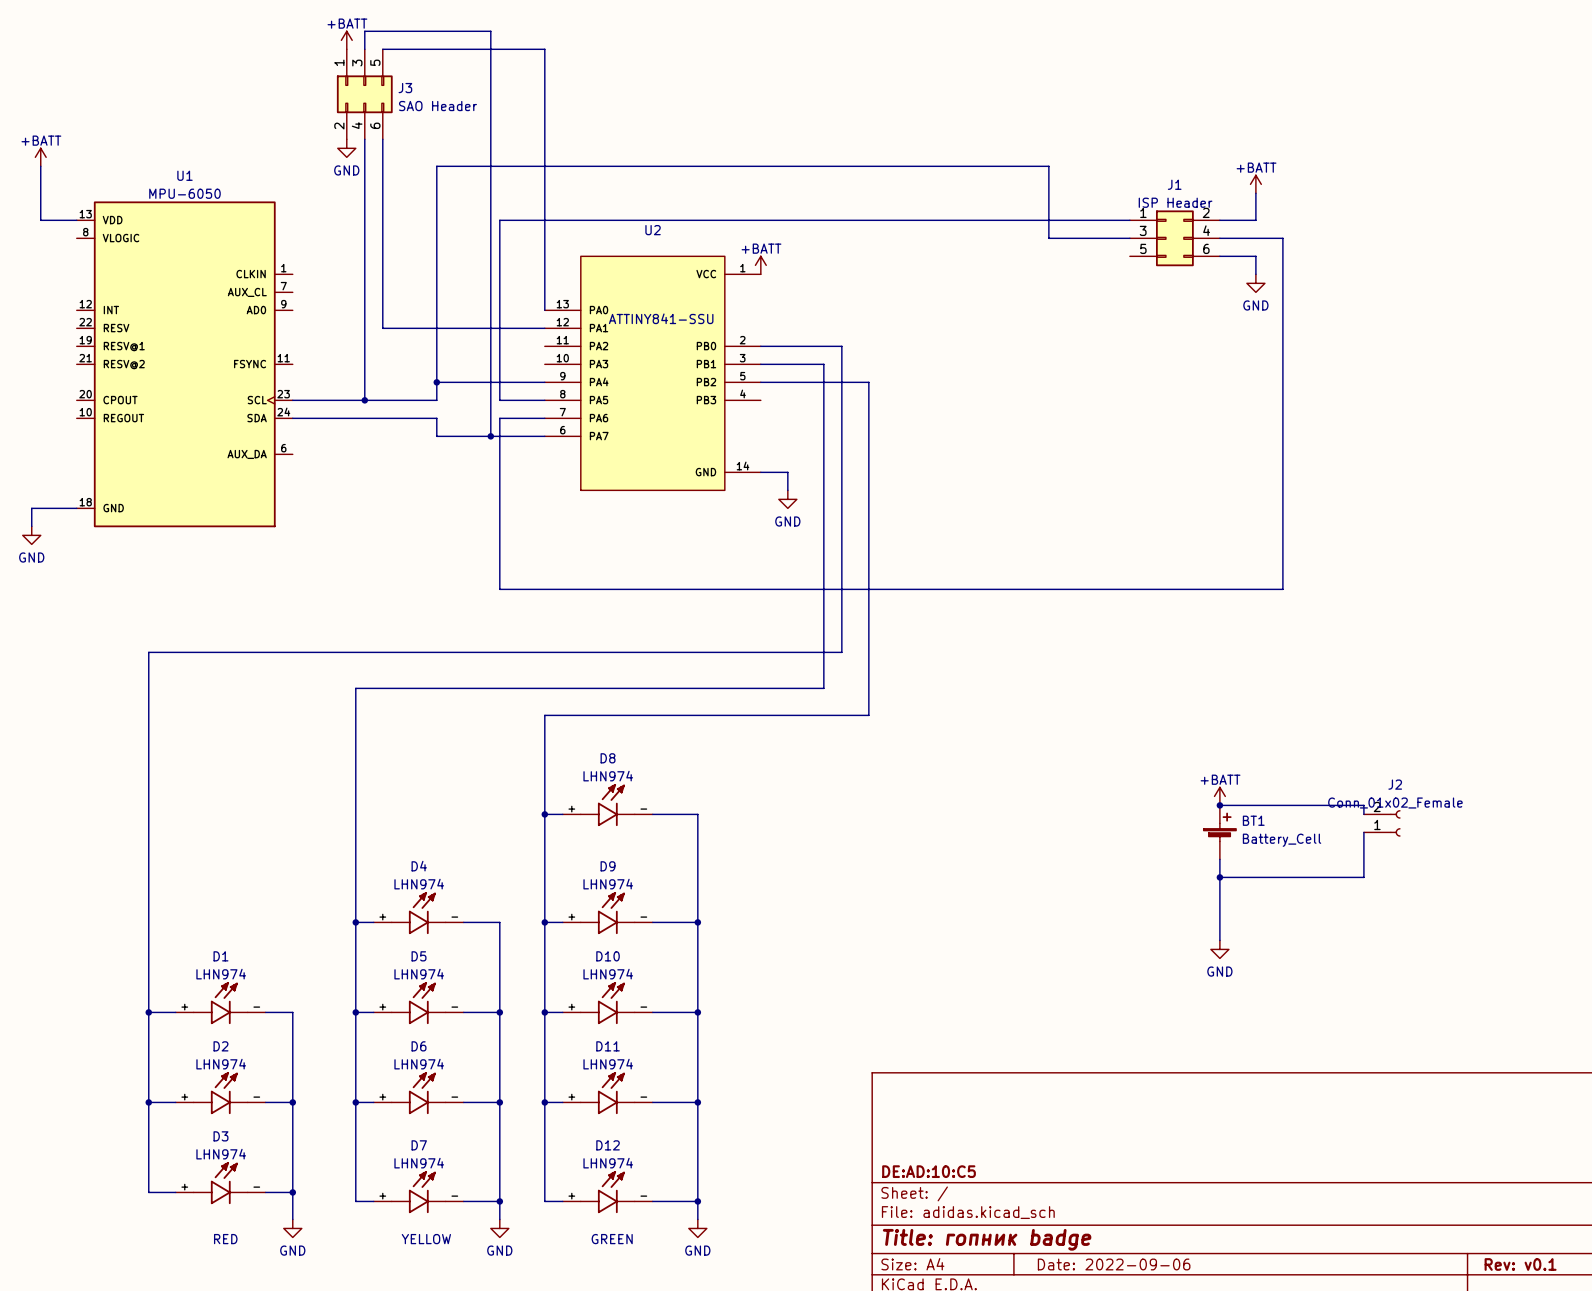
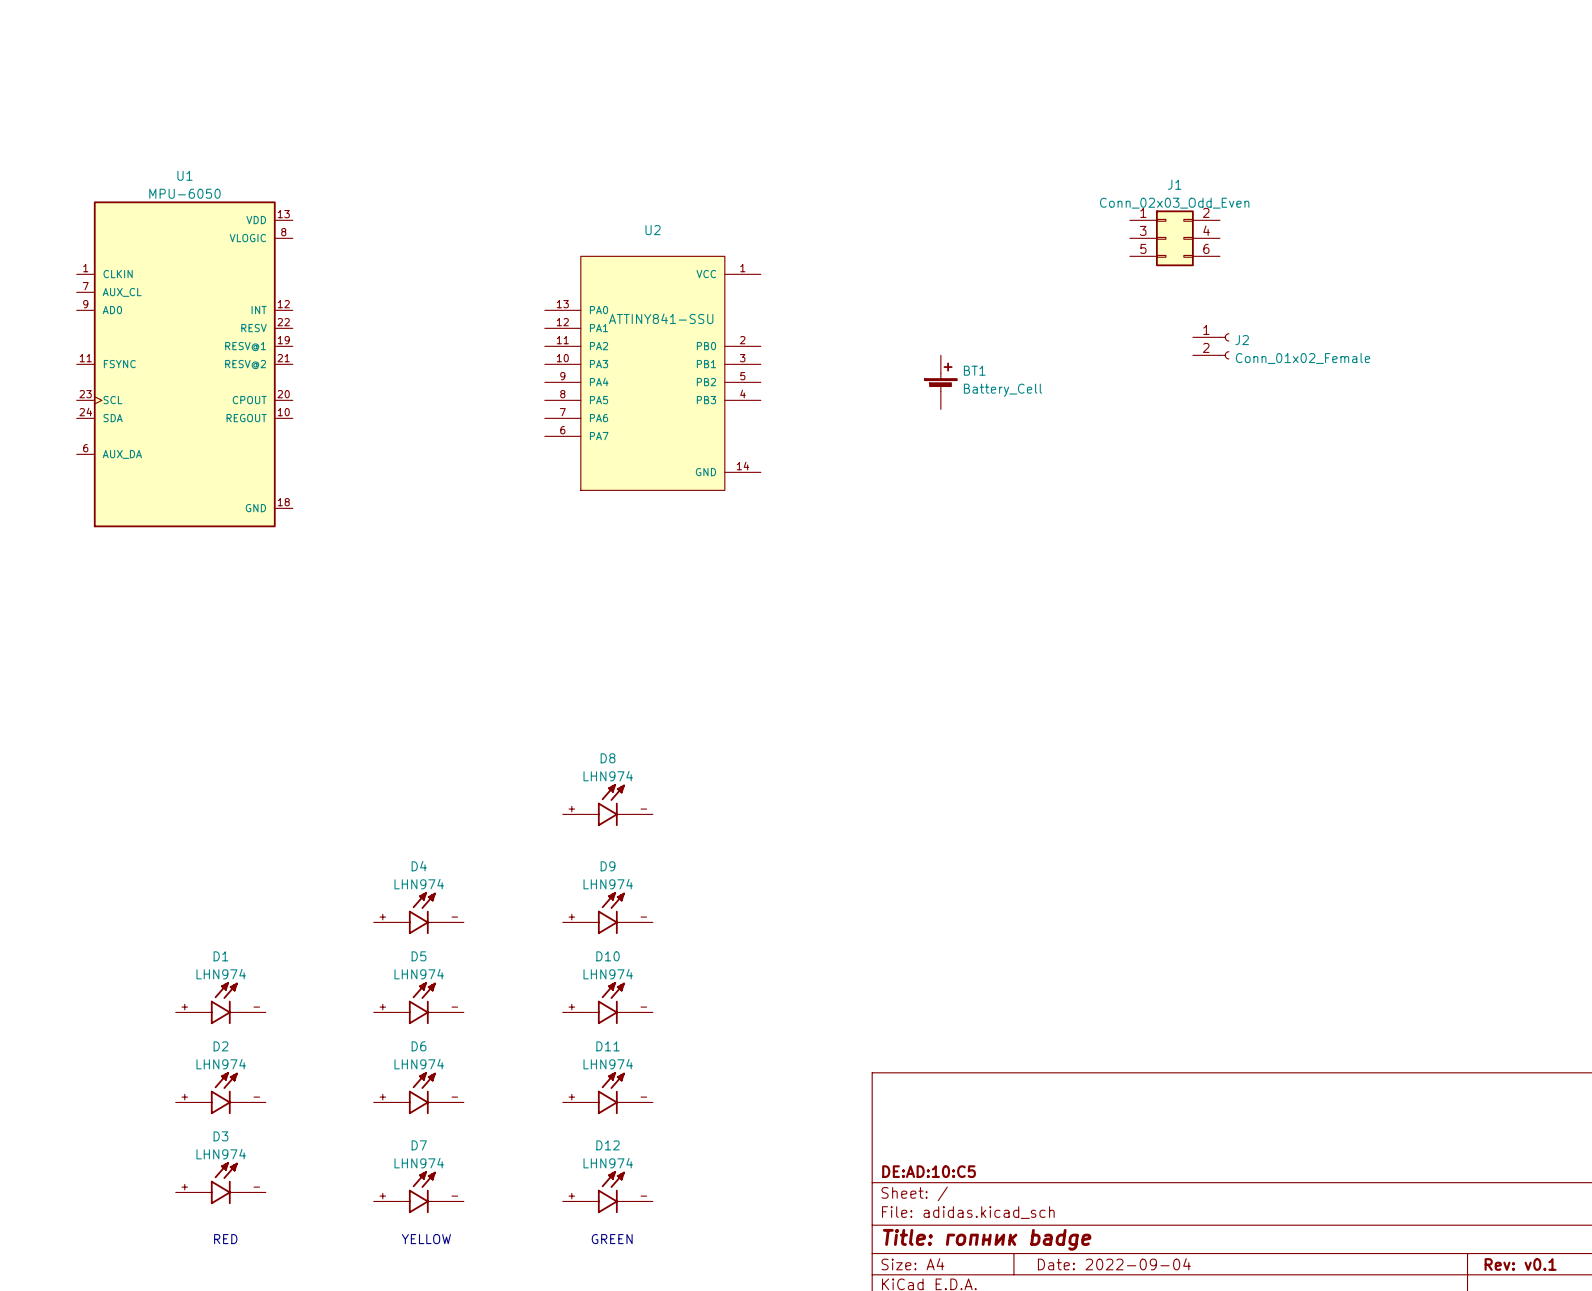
power symbol: +BATT (346, 40) -> none
wire: (364, 49) (364, 31) (490, 31) (490, 436) -> none
wire: (382, 49) (544, 49) (544, 310) -> none
J3: SAO Header (364, 94) -> none
wire: (364, 139) (364, 400) -> none
wire: (382, 139) (382, 328) (544, 328) -> none
power symbol: GND (346, 148) -> none
power symbol: +BATT (40, 157) -> none
wire: (40, 166) (40, 220) (76, 220) -> none
power symbol: +BATT (1255, 184) -> none
wire: (1255, 193) (1255, 220) (1219, 220) -> none
J1 value: ISP Header (1175, 202) -> Conn_02x03_Odd_Even (1174, 203)
wire: (1129, 220) (499, 220) (499, 400) (544, 400) -> none
wire: (1129, 238) (1048, 238) (1048, 166) (436, 166) (436, 400) (292, 400) -> none
wire: (1219, 238) (1282, 238) (1282, 589) (499, 589) (499, 418) (544, 418) -> none
wire: (1219, 256) (1255, 256) (1255, 274) -> none
power symbol: +BATT (760, 265) -> none
power symbol: GND (1255, 283) -> none
wire: (760, 346) (841, 346) (841, 652) (148, 652) (148, 1192) (175, 1192) -> none
U1 flip: as is (184, 364) -> left-right (184, 364)
wire: (760, 364) (823, 364) (823, 688) (355, 688) (355, 1201) (373, 1201) -> none
wire: (436, 382) (544, 382) -> none
junction: (436, 382) -> none
wire: (760, 382) (868, 382) (868, 715) (544, 715) (544, 1201) (562, 1201) -> none
junction: (364, 400) -> none
wire: (292, 418) (436, 418) (436, 436) (544, 436) -> none
junction: (490, 436) -> none
wire: (760, 472) (787, 472) (787, 490) -> none
power symbol: GND (787, 499) -> none
wire: (76, 508) (31, 508) (31, 526) -> none
power symbol: GND (31, 535) -> none
J2 name position: J2 (1395, 784) -> J2 (1242, 340)
power symbol: +BATT (1219, 796) -> none
J2 value position: Conn_01x02_Female (1395, 803) -> Conn_01x02_Female (1303, 358)
wire: (1219, 805) (1363, 805) (1363, 814) -> none
junction: (1219, 805) -> none
wire: (544, 814) (562, 814) -> none
junction: (544, 814) -> none
wire: (652, 814) (697, 814) (697, 1219) -> none
J2 position: (1382, 823) -> (1211, 346)
J2 flip: as is (1395, 823) -> up-down (1224, 346)
BT1 position: (1219, 832) -> (940, 382)
wire: (1363, 832) (1363, 877) (1219, 877) -> none
wire: (1219, 859) (1219, 940) -> none
junction: (1219, 877) -> none
wire: (355, 922) (373, 922) -> none
junction: (355, 922) -> none
wire: (463, 922) (499, 922) (499, 1219) -> none
wire: (544, 922) (562, 922) -> none
junction: (544, 922) -> none
wire: (652, 922) (697, 922) -> none
junction: (697, 922) -> none
power symbol: GND (1219, 949) -> none
wire: (148, 1012) (175, 1012) -> none
junction: (148, 1012) -> none
wire: (265, 1012) (292, 1012) (292, 1219) -> none
wire: (355, 1012) (373, 1012) -> none
junction: (355, 1012) -> none
wire: (463, 1012) (499, 1012) -> none
junction: (499, 1012) -> none
wire: (544, 1012) (562, 1012) -> none
junction: (544, 1012) -> none
wire: (652, 1012) (697, 1012) -> none
junction: (697, 1012) -> none
wire: (148, 1102) (175, 1102) -> none
junction: (148, 1102) -> none
wire: (265, 1102) (292, 1102) -> none
junction: (292, 1102) -> none
wire: (355, 1102) (373, 1102) -> none
junction: (355, 1102) -> none
wire: (463, 1102) (499, 1102) -> none
junction: (499, 1102) -> none
wire: (544, 1102) (562, 1102) -> none
junction: (544, 1102) -> none
wire: (652, 1102) (697, 1102) -> none
junction: (697, 1102) -> none
wire: (265, 1192) (292, 1192) -> none
junction: (292, 1192) -> none
wire: (463, 1201) (499, 1201) -> none
junction: (499, 1201) -> none
wire: (652, 1201) (697, 1201) -> none
junction: (697, 1201) -> none
power symbol: GND (292, 1228) -> none
power symbol: GND (499, 1228) -> none
power symbol: GND (697, 1228) -> none
title block: Date: 2022-09-06 (1114, 1264) -> Date: 2022-09-04 (1114, 1264)

